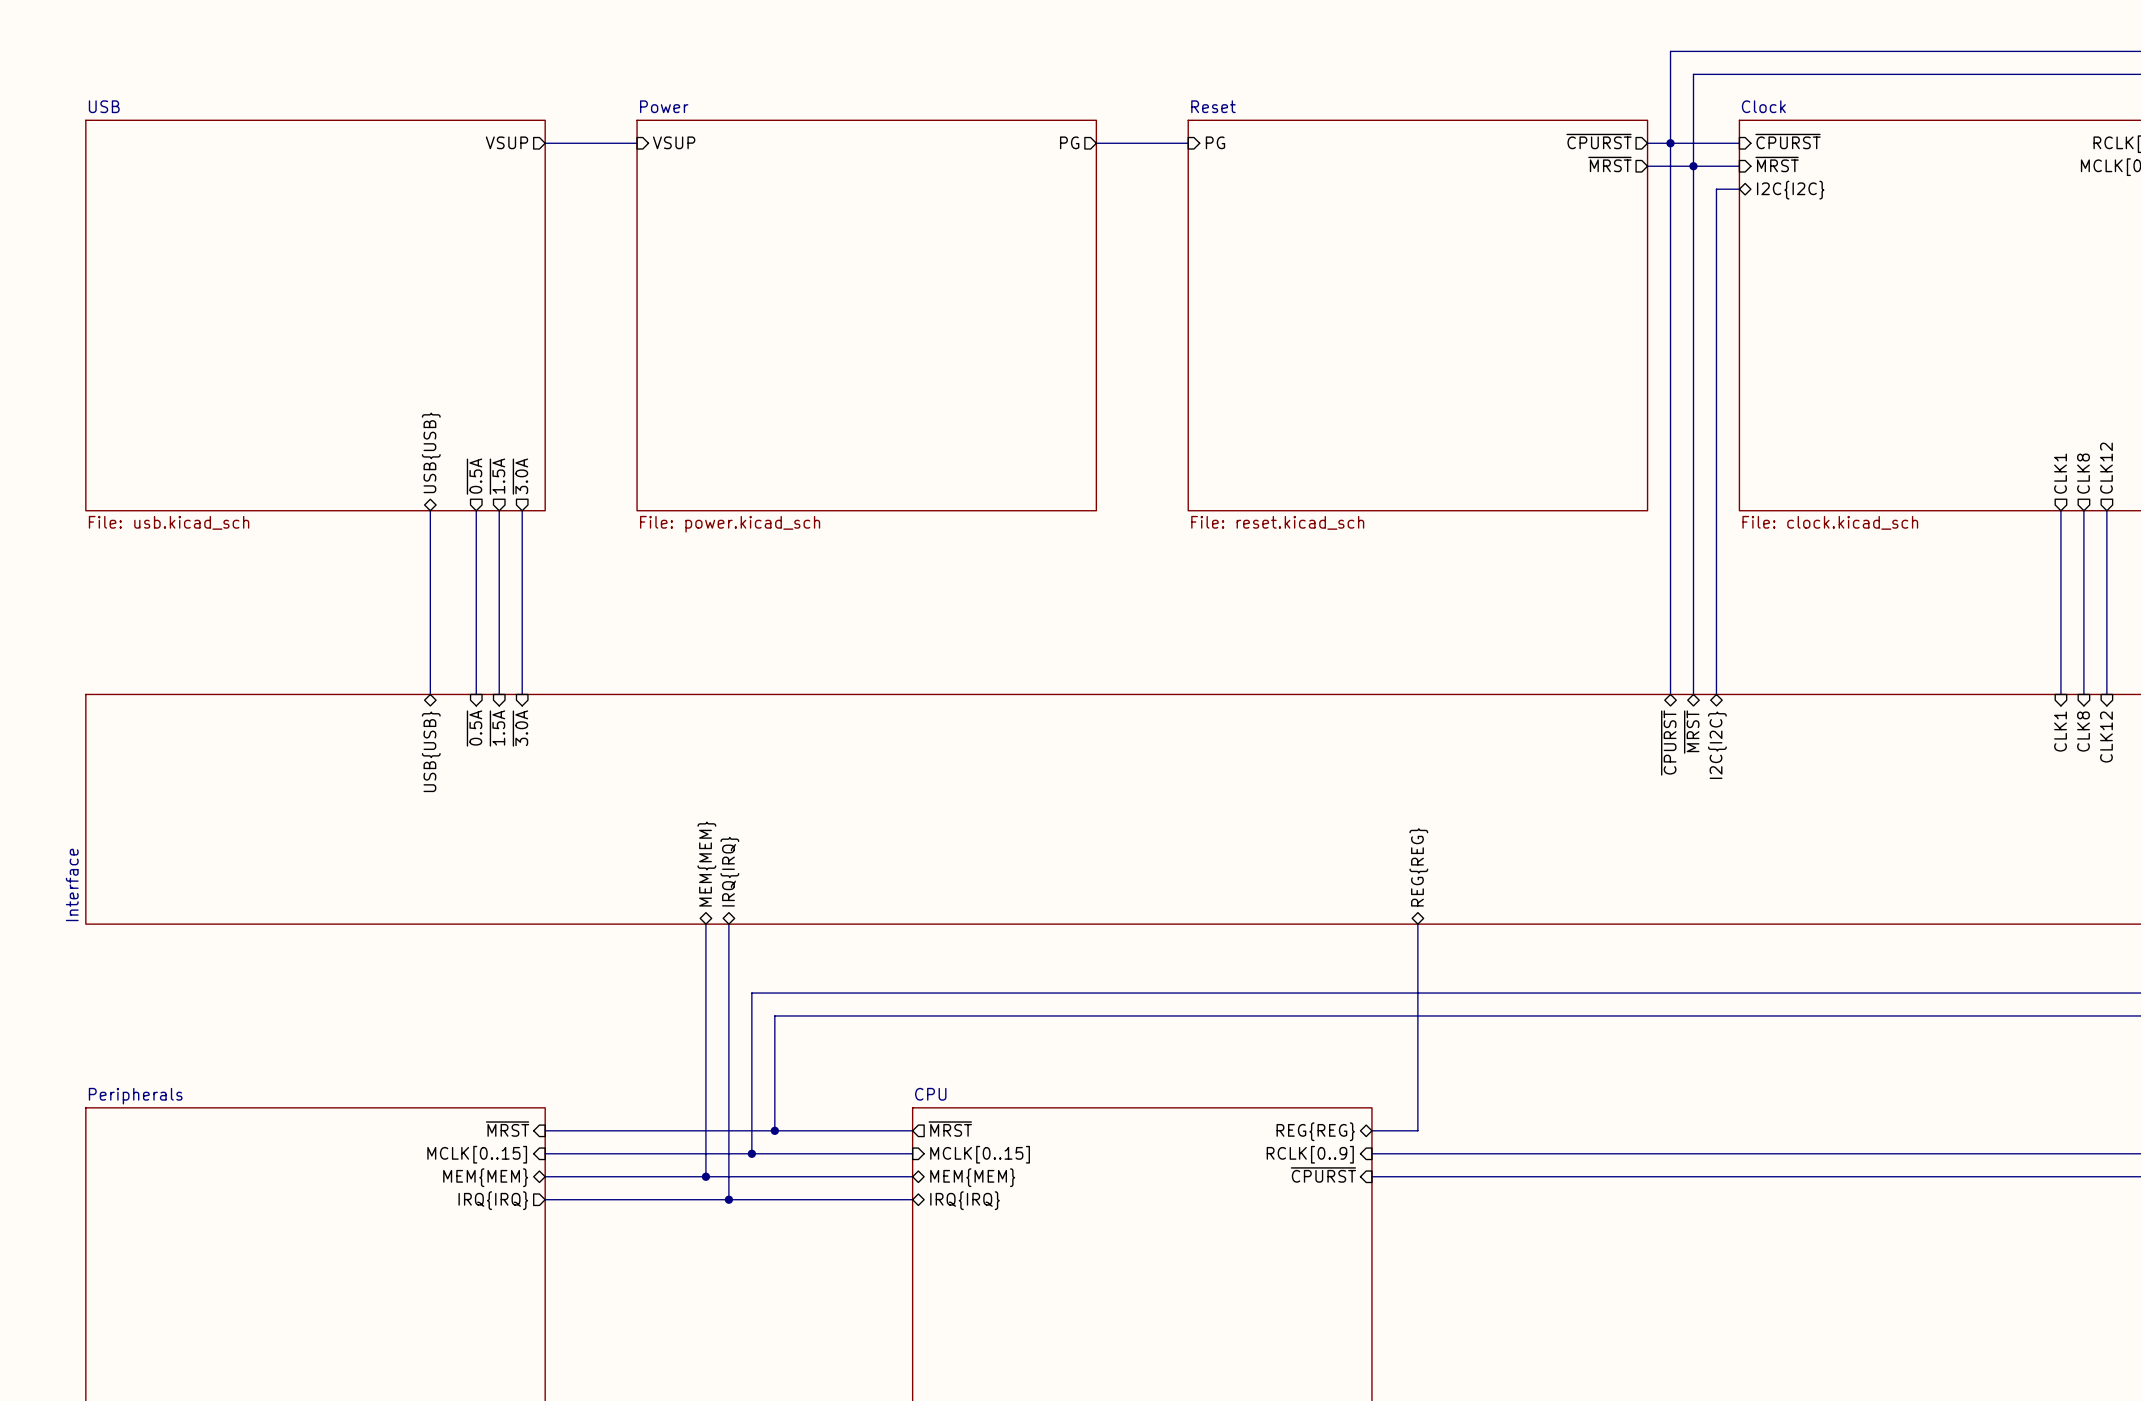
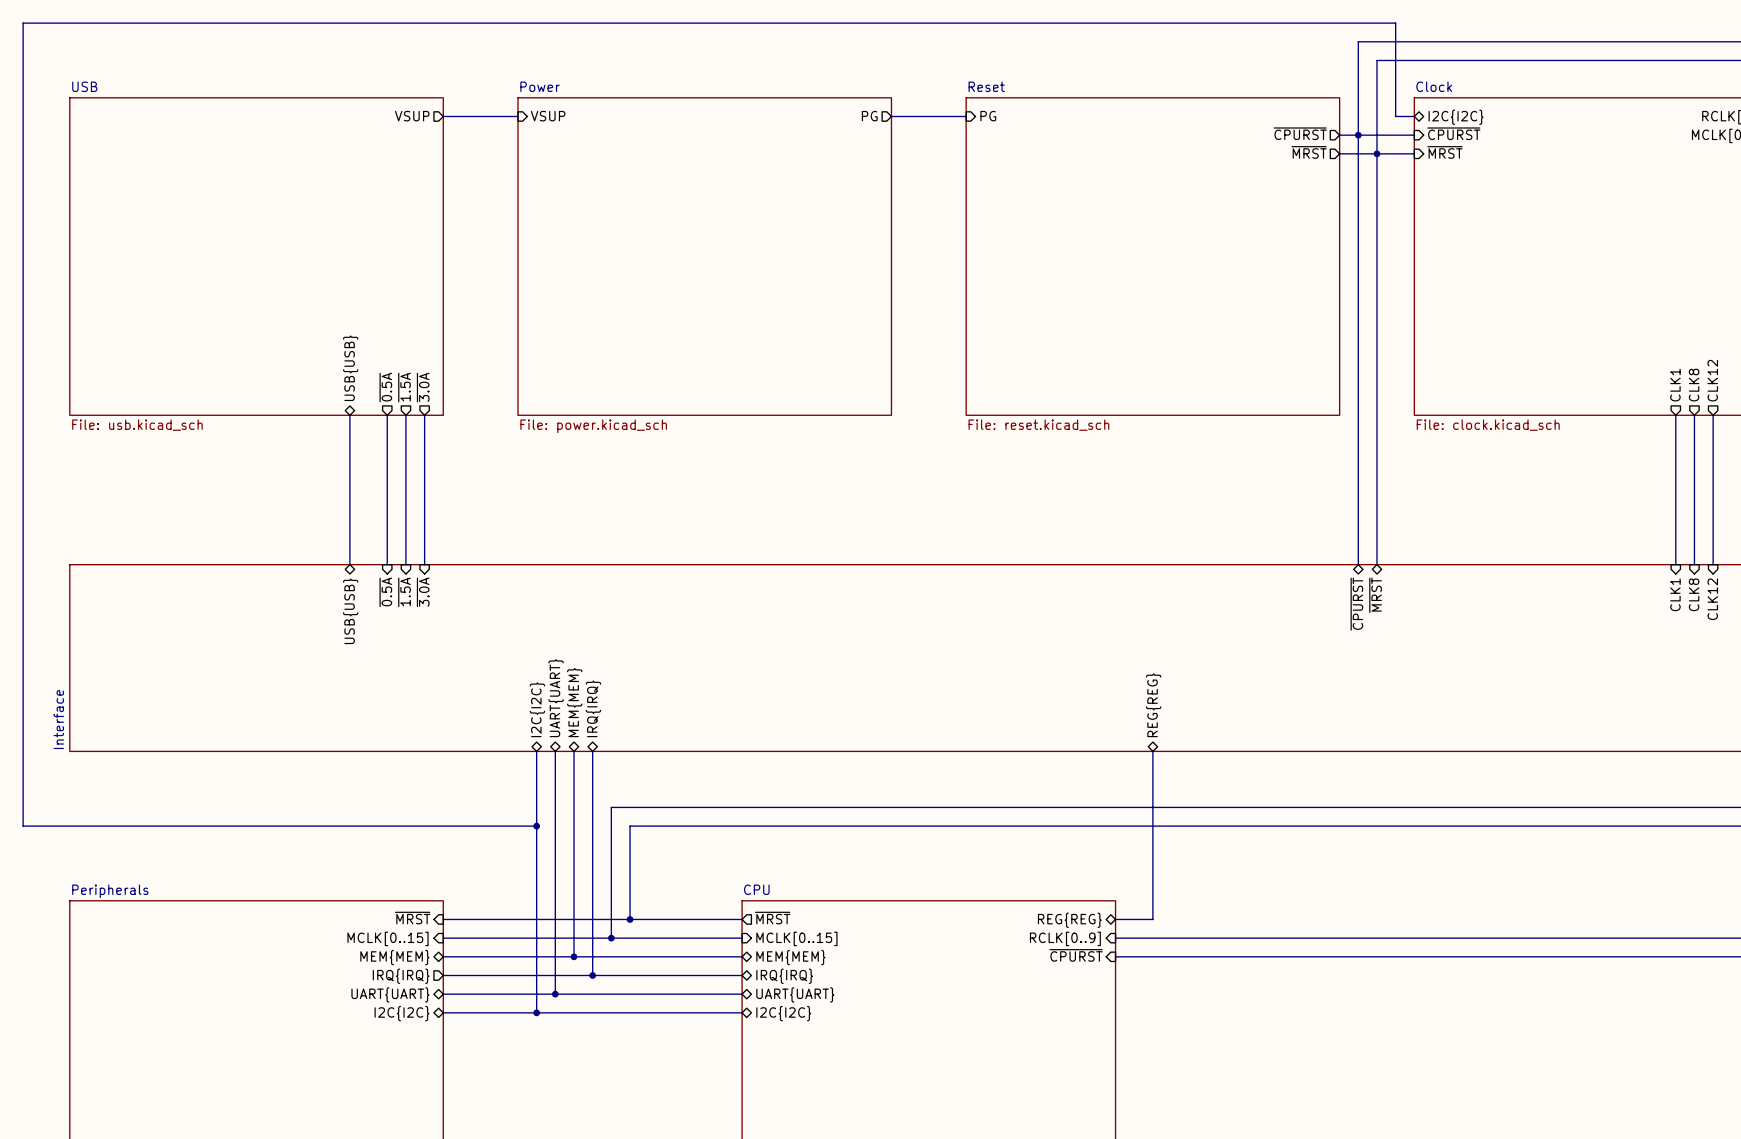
sheet pin: ~{CPURST} (1599, 141) -> none
sheet pin shape: input (1788, 141) -> bidirectional (1456, 117)
sheet pin: ~{CPURST} (1788, 141) -> I2C{I2C} (1456, 117)
wire: (1647, 143) (1739, 143) -> (1339, 153) (1414, 153)
junction: (1670, 143) -> none
bus: none -> (1414, 116) (1395, 116) (1395, 23) (23, 23) (23, 826) (536, 826)
sheet pin: ~{MRST} (1609, 164) -> ~{CPURST} (1300, 133)
sheet pin: ~{MRST} (1777, 164) -> ~{CPURST} (1453, 133)
junction: none -> (1358, 135)
junction: (1693, 166) -> none
sheet pin: none -> ~{MRST} (1309, 152)
junction: none -> (1376, 153)
bus: (1739, 189) (1716, 189) (1716, 694) -> none
sheet pin shape: bidirectional (1790, 190) -> input (1444, 152)
sheet pin: I2C{I2C} (1790, 190) -> ~{MRST} (1444, 152)
sheet pin: I2C{I2C} (1717, 745) -> none
sheet pin: none -> UART{UART} (556, 698)
sheet pin: none -> I2C{I2C} (537, 709)
bus: none -> (536, 751) (536, 1012)
bus: none -> (555, 751) (555, 994)
junction: none -> (536, 826)
bus: none -> (443, 994) (742, 994)
junction: none -> (555, 994)
sheet pin: none -> UART{UART} (390, 994)
sheet pin: none -> UART{UART} (795, 994)
bus: none -> (443, 1012) (742, 1012)
junction: none -> (536, 1012)
sheet pin: none -> I2C{I2C} (402, 1013)
sheet pin: none -> I2C{I2C} (783, 1013)

